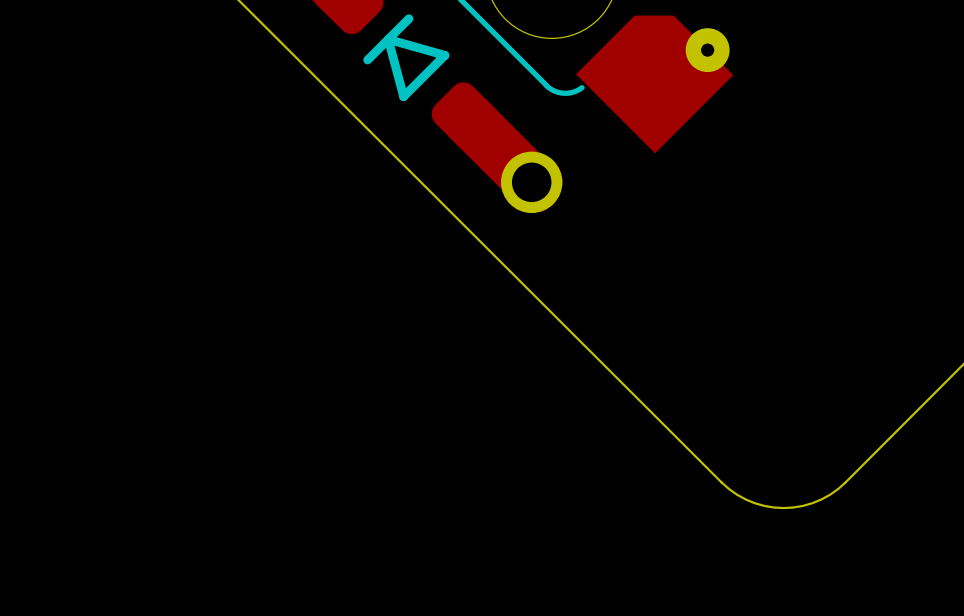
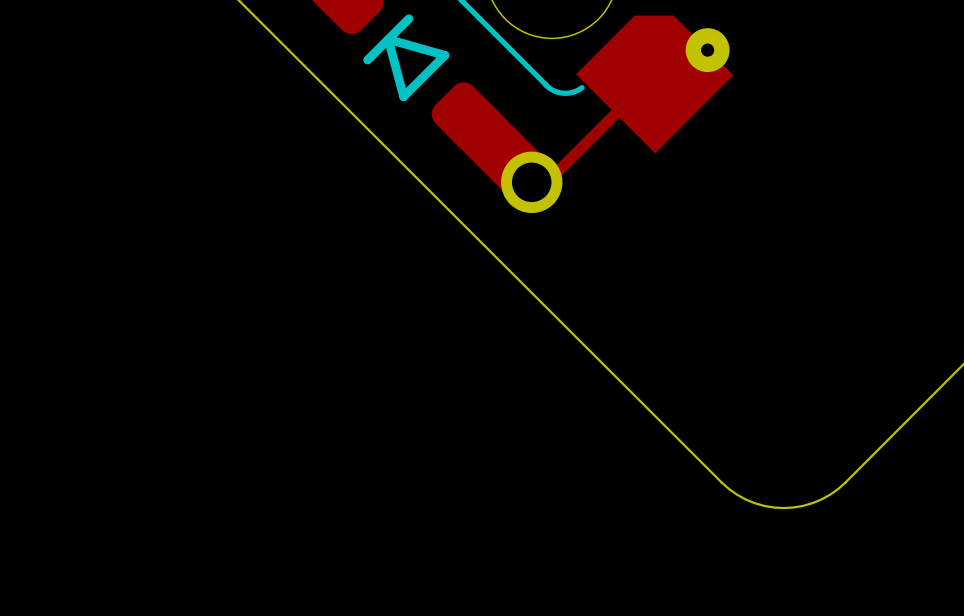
track: none -> (654, 74) (547, 182) (531, 182)

